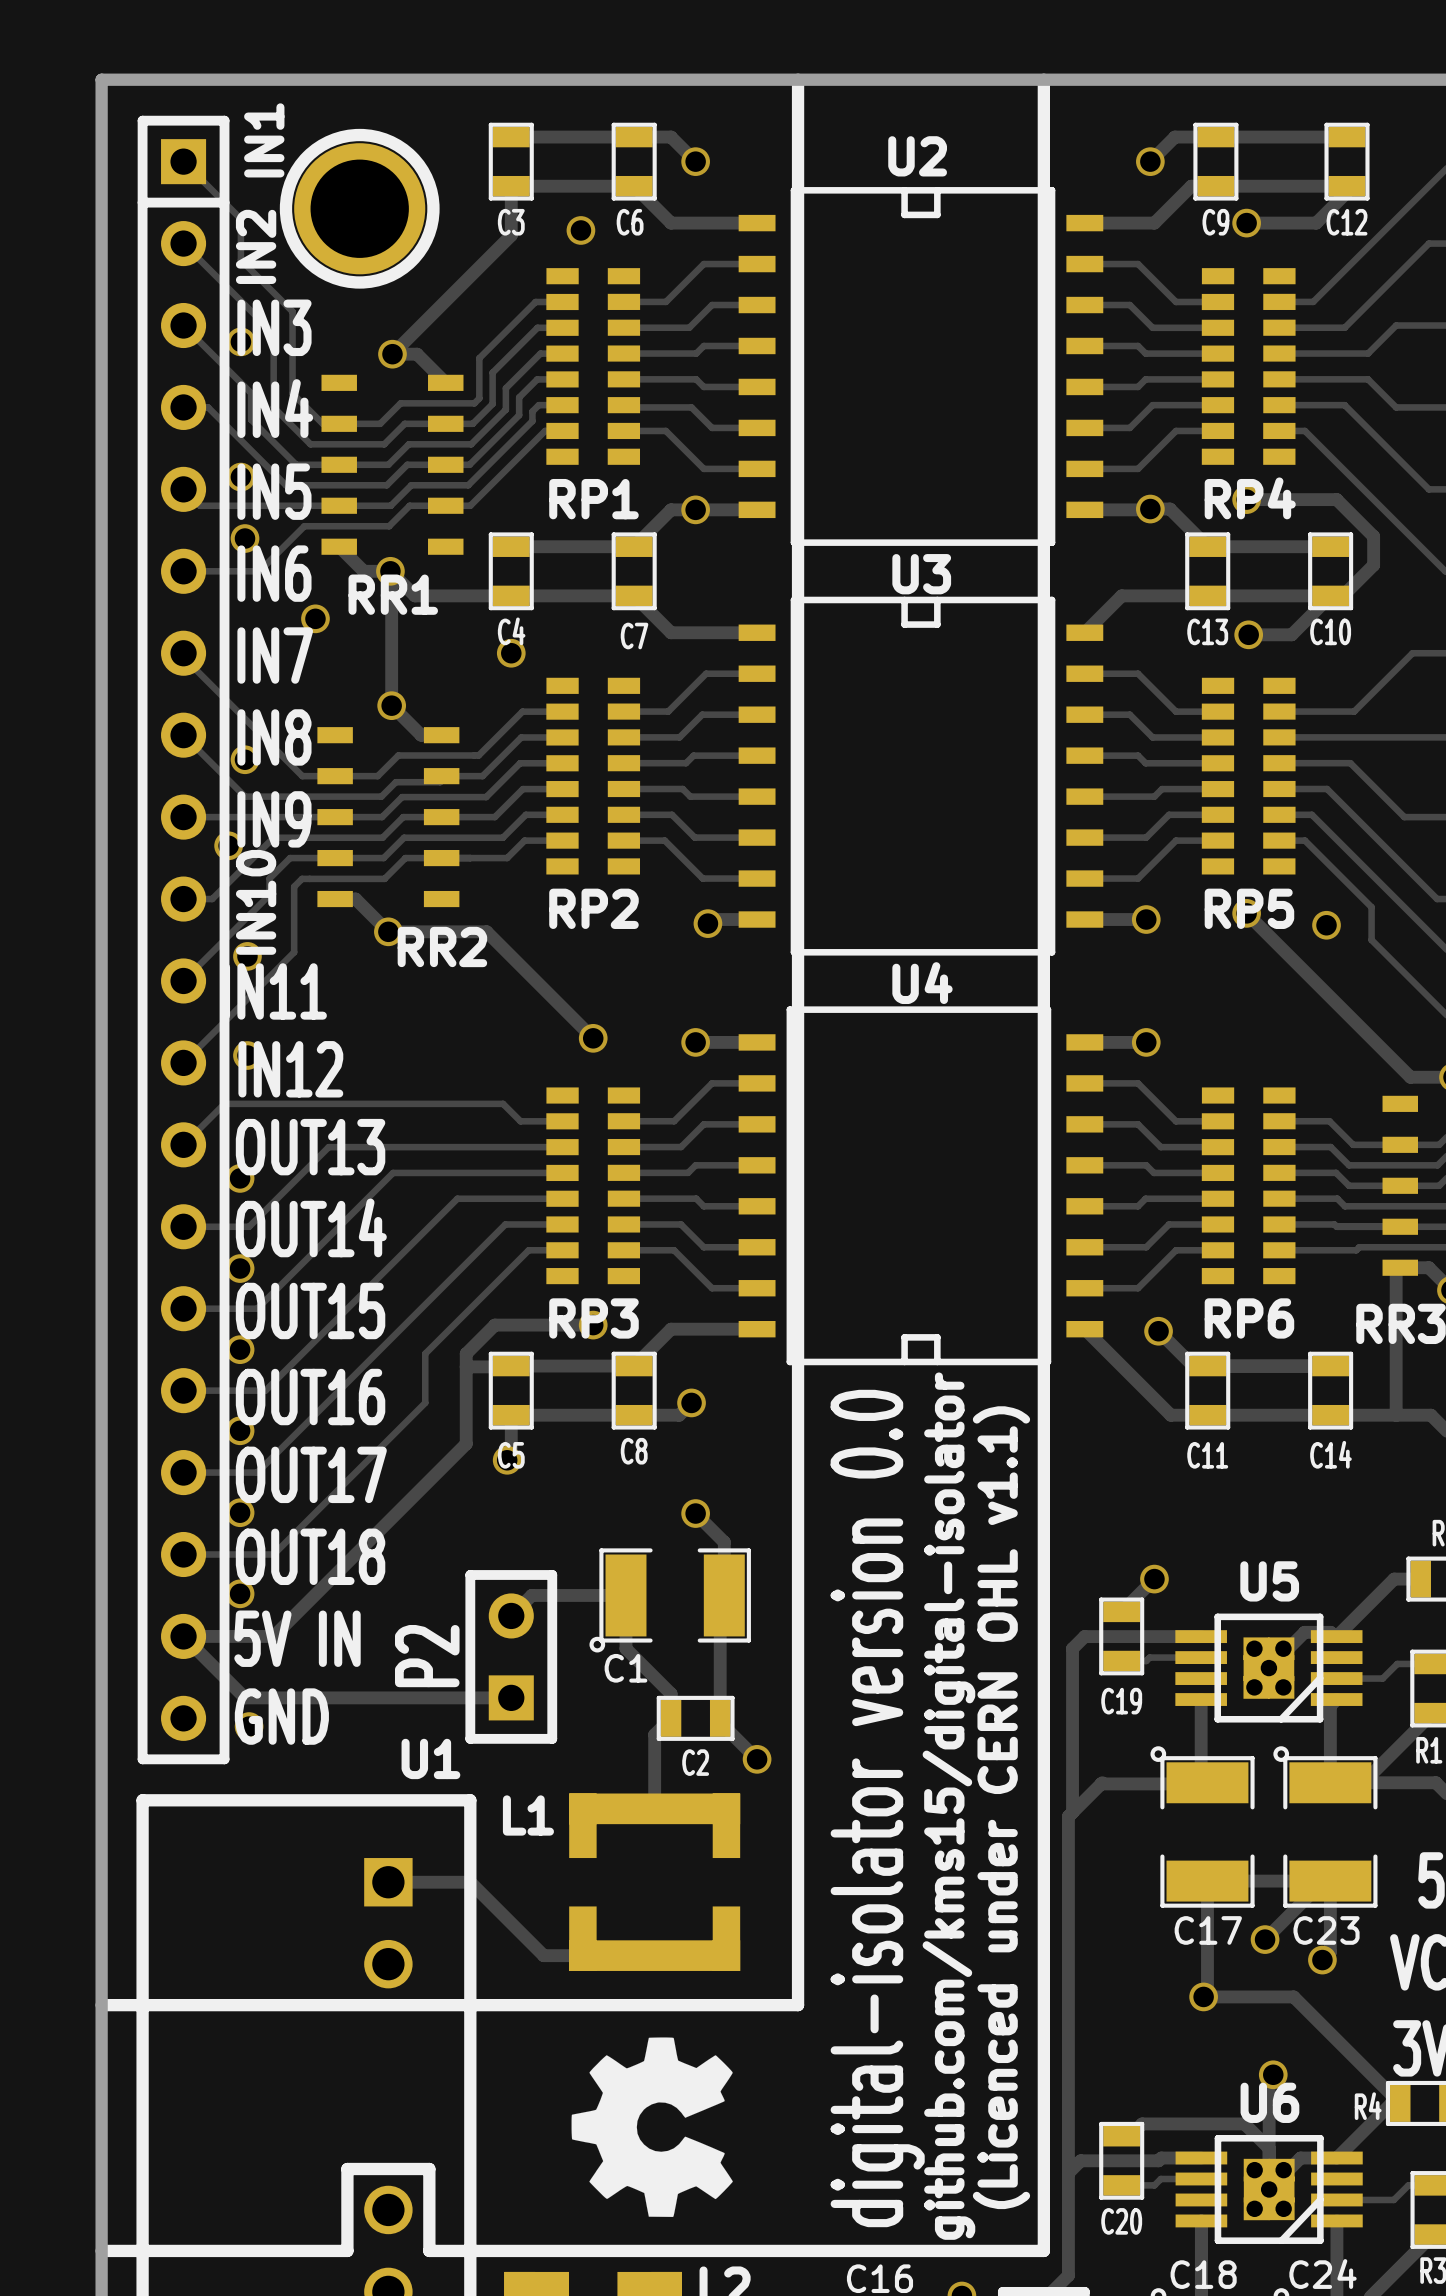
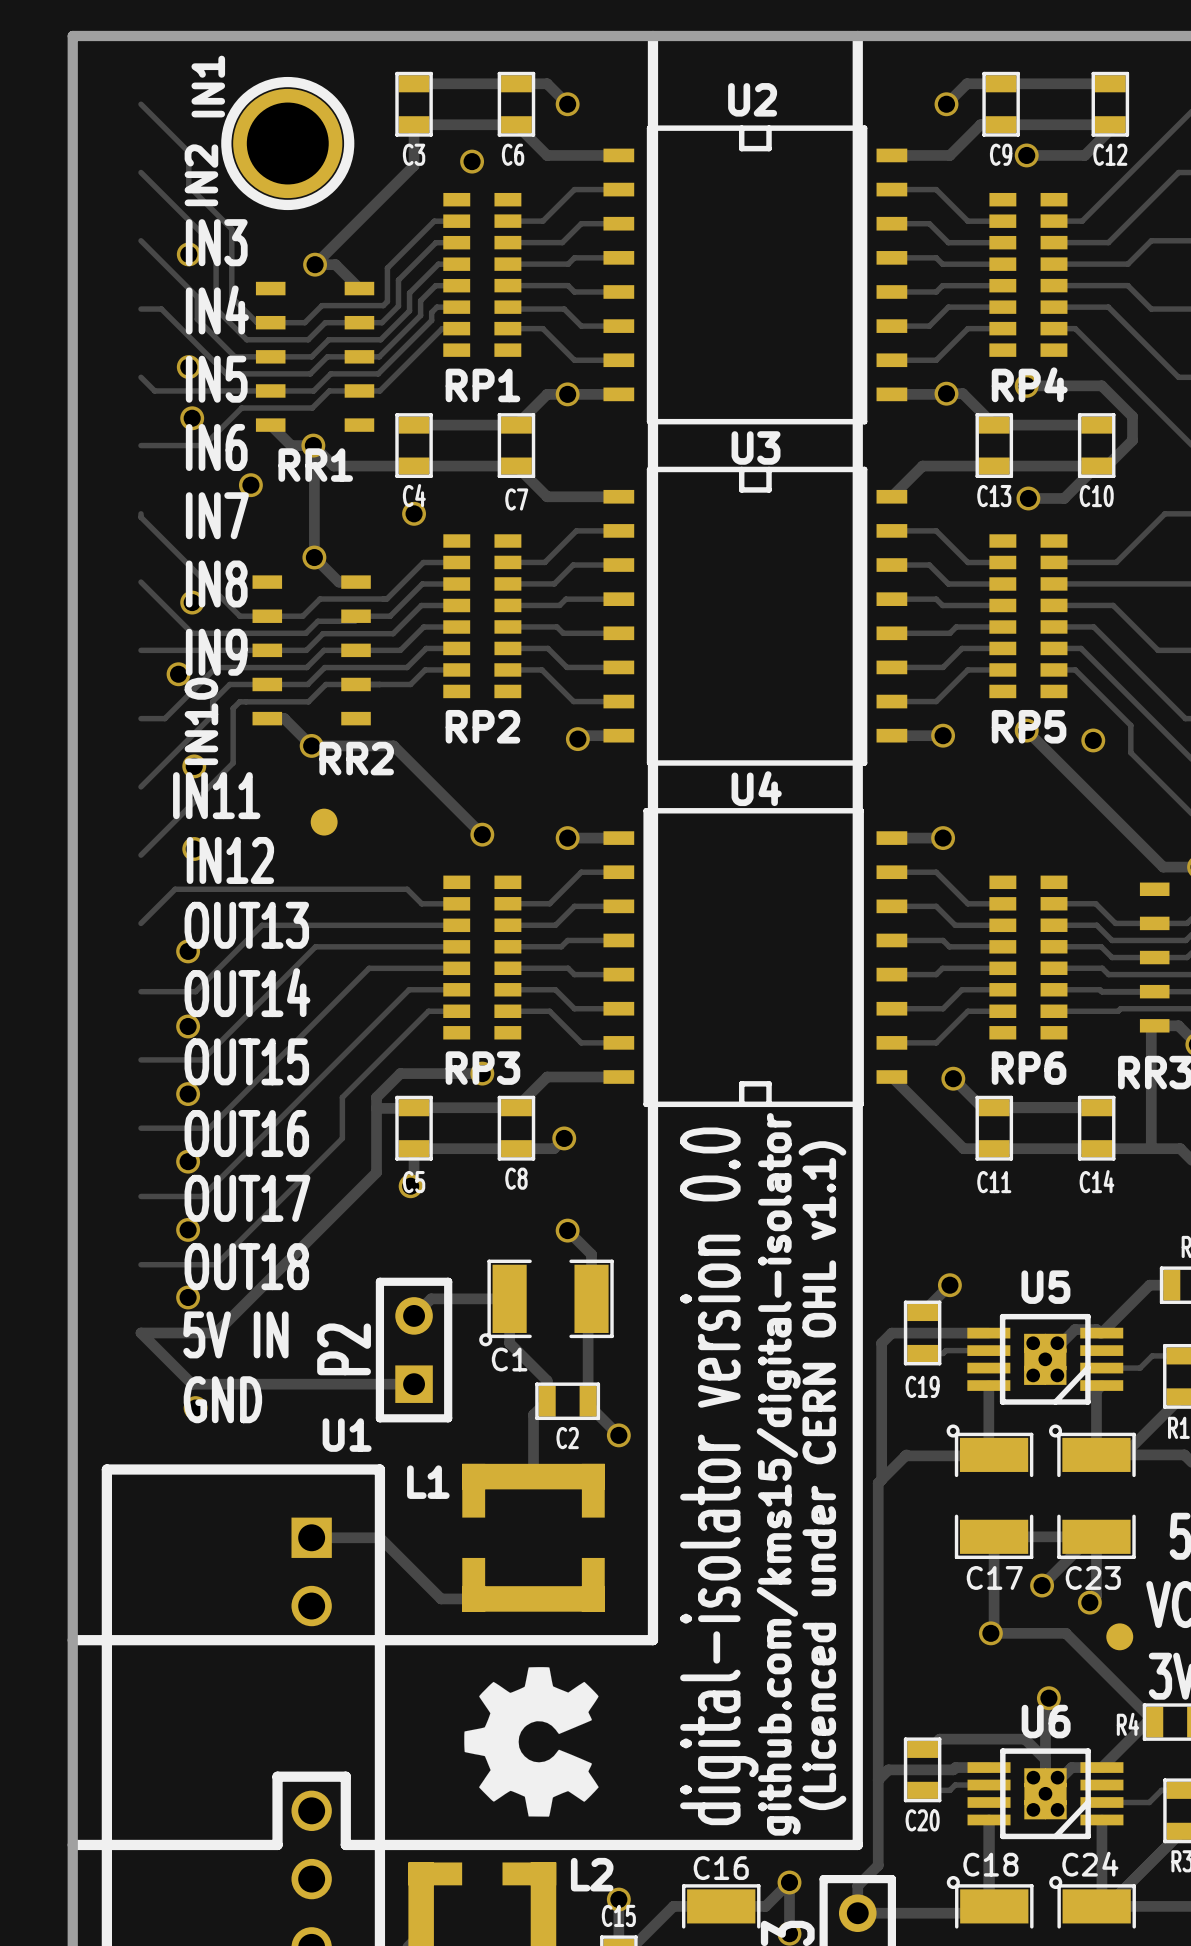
part: (183, 940) -> none
part: none -> (324, 822)
part: none -> (1119, 1636)

